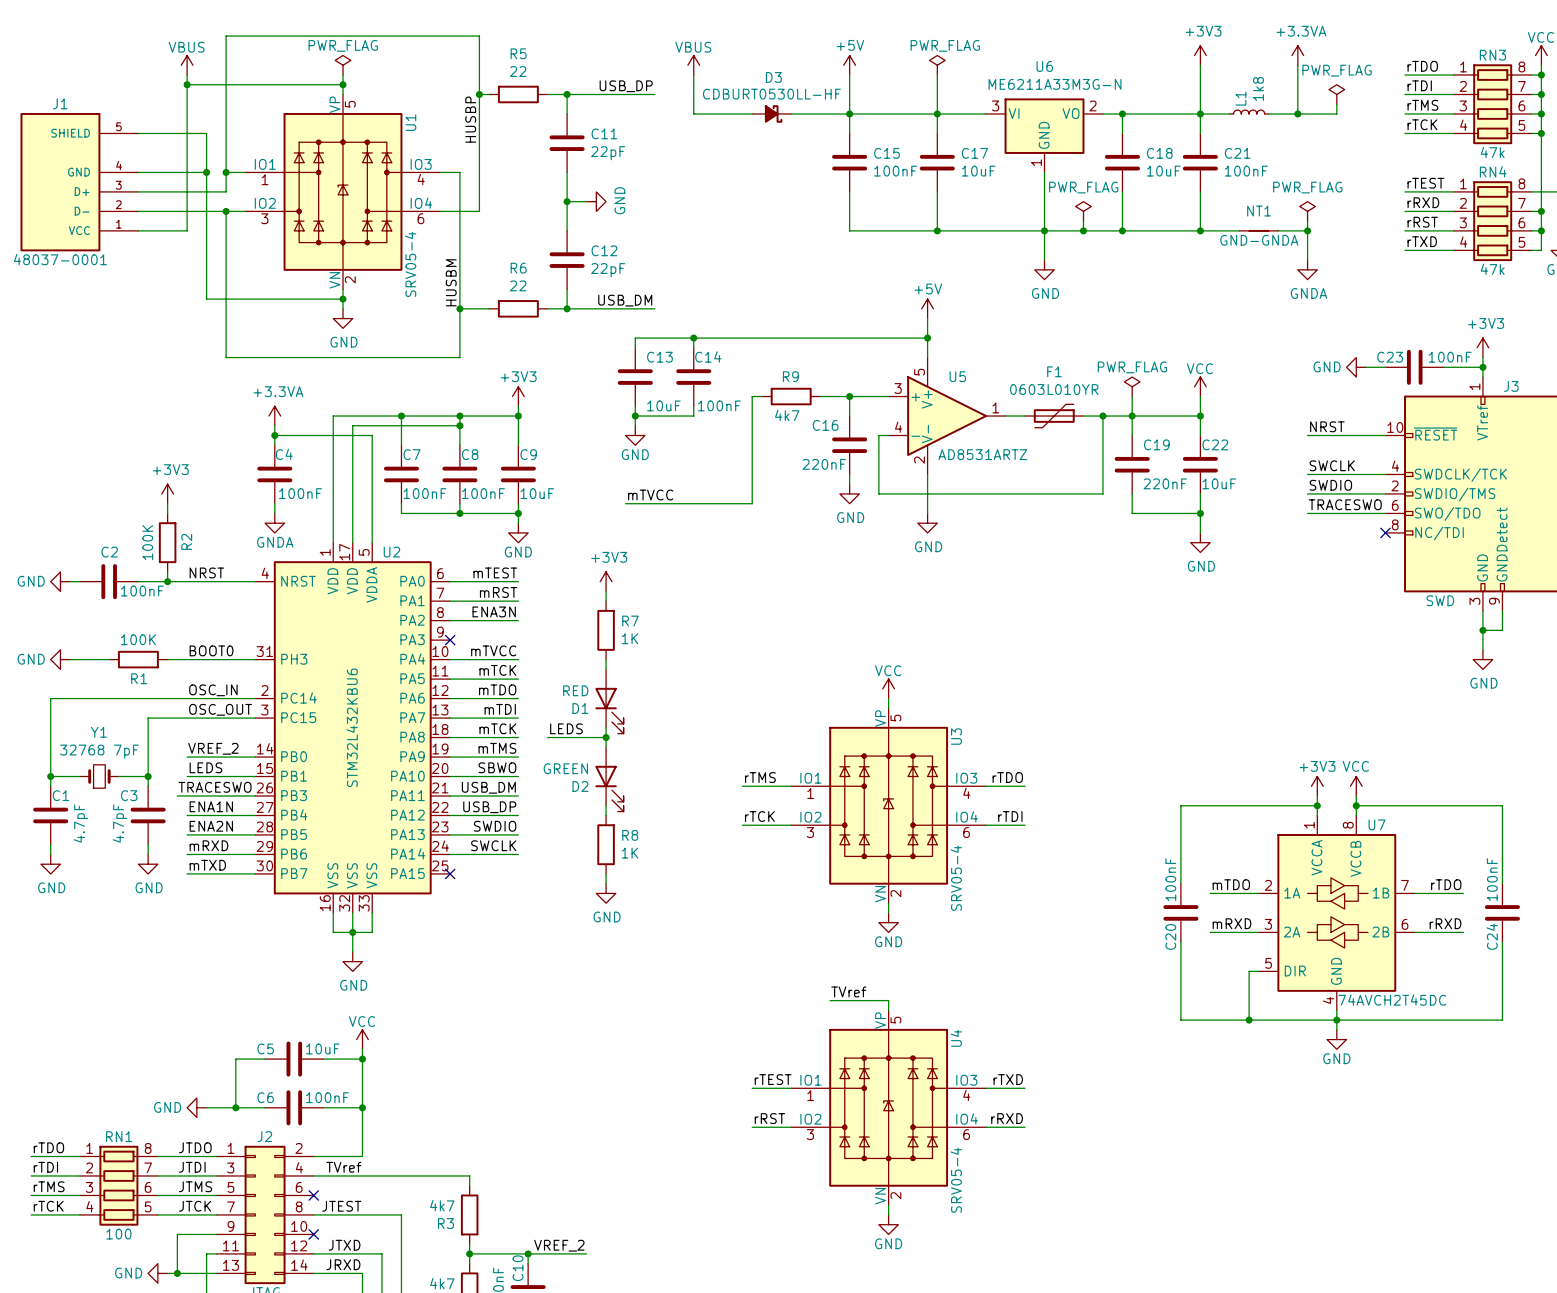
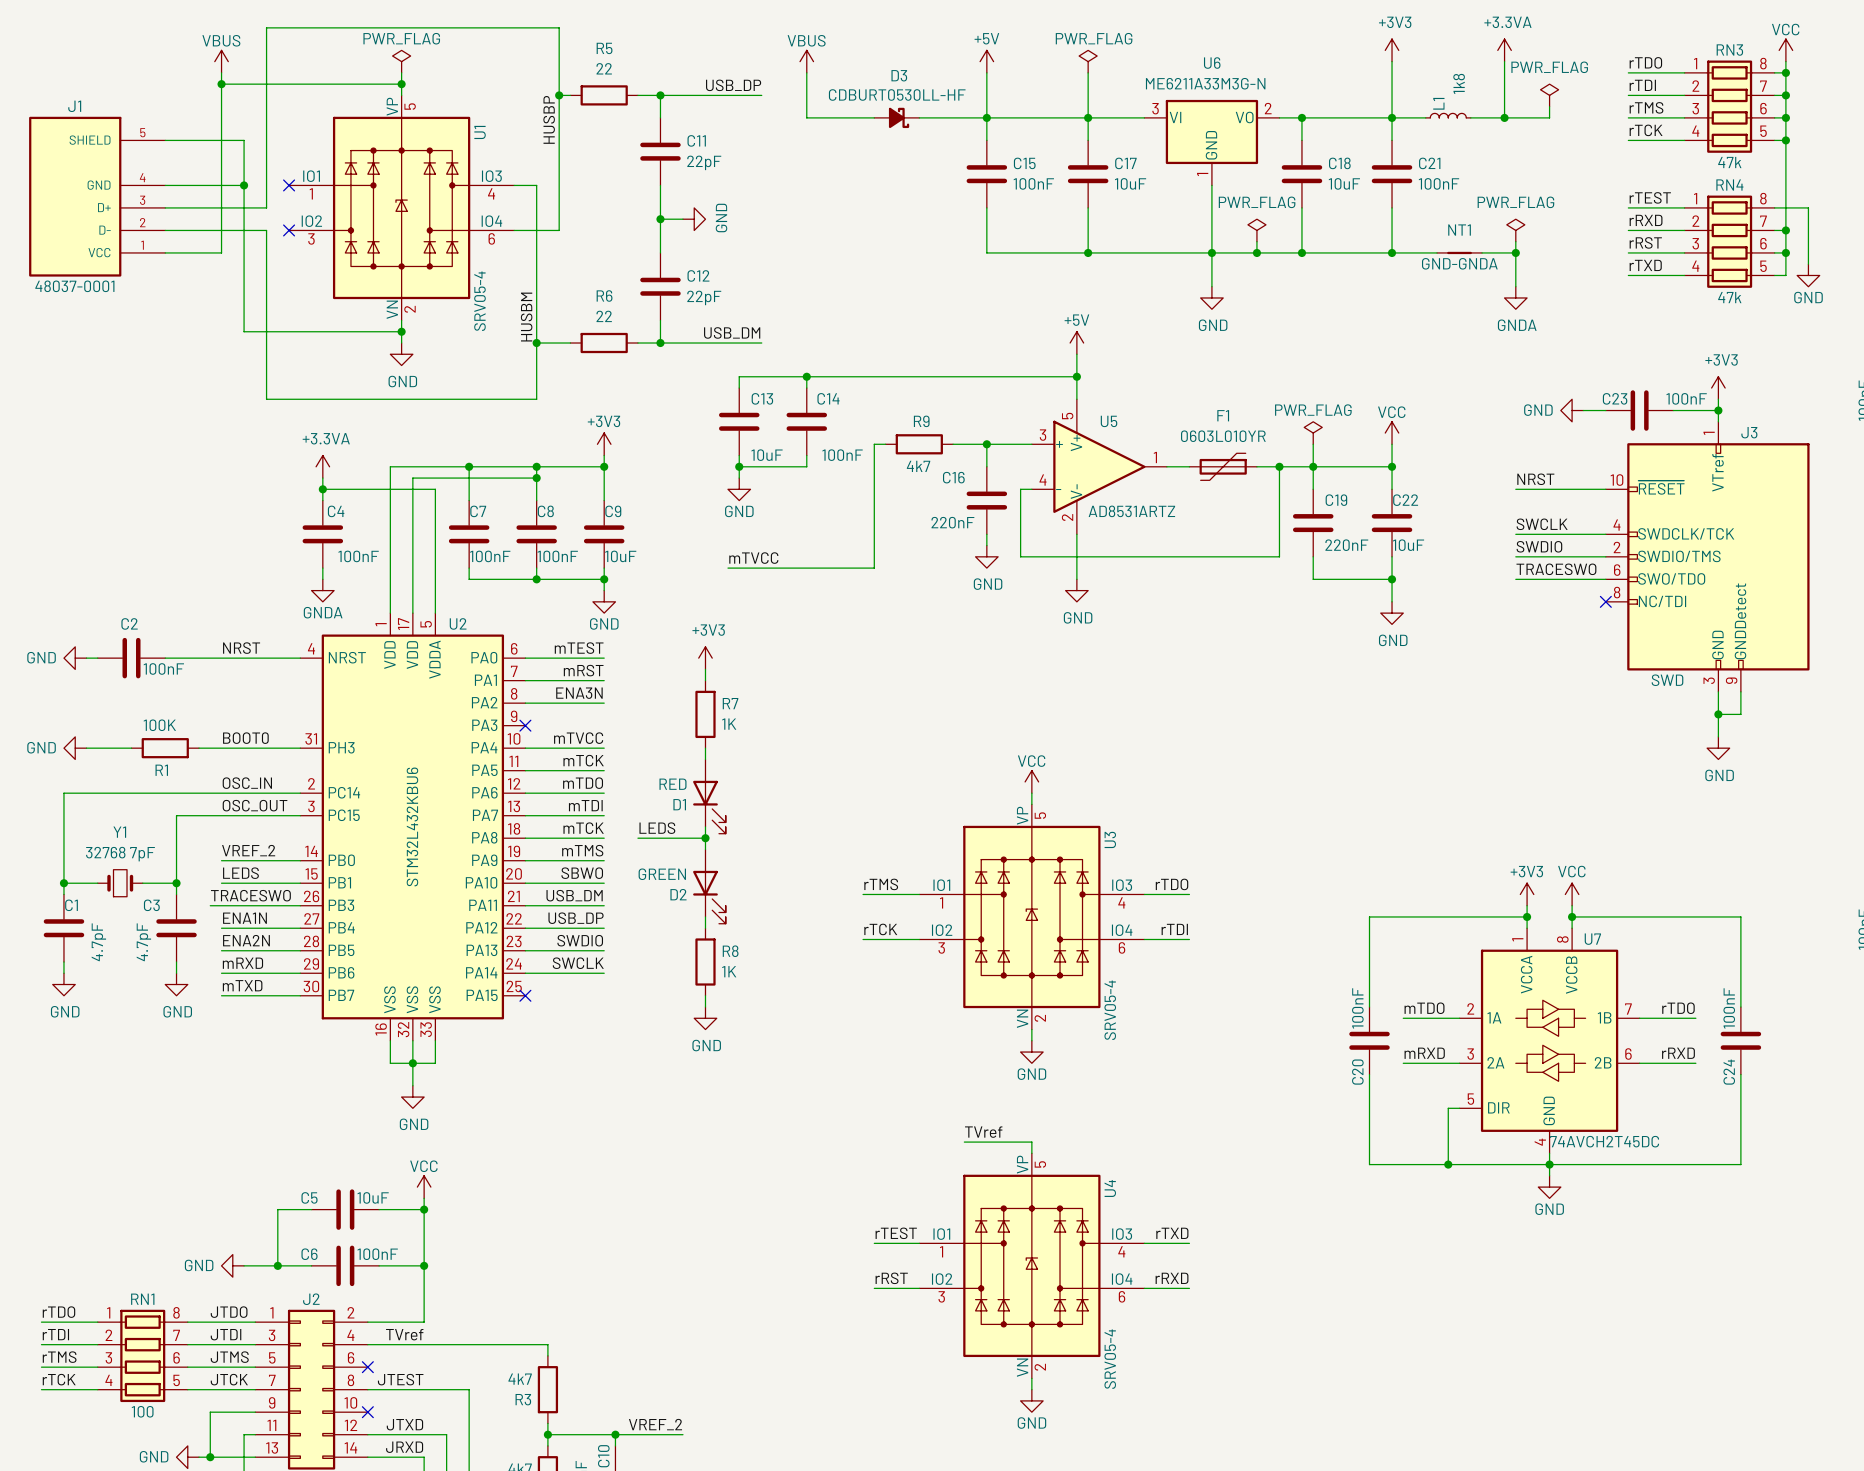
wire: (226, 172) (245, 172) -> none
junction: (226, 172) -> none
no-connect mark: none -> (289, 185)
wire: (226, 211) (245, 211) -> none
junction: (226, 211) -> none
no-connect mark: none -> (289, 230)
power symbol: +3V3 (167, 493) -> none
wire: (167, 503) (167, 513) -> none
R2: 100K (167, 542) -> none
wire: (167, 571) (167, 581) -> none
junction: (167, 581) -> none

